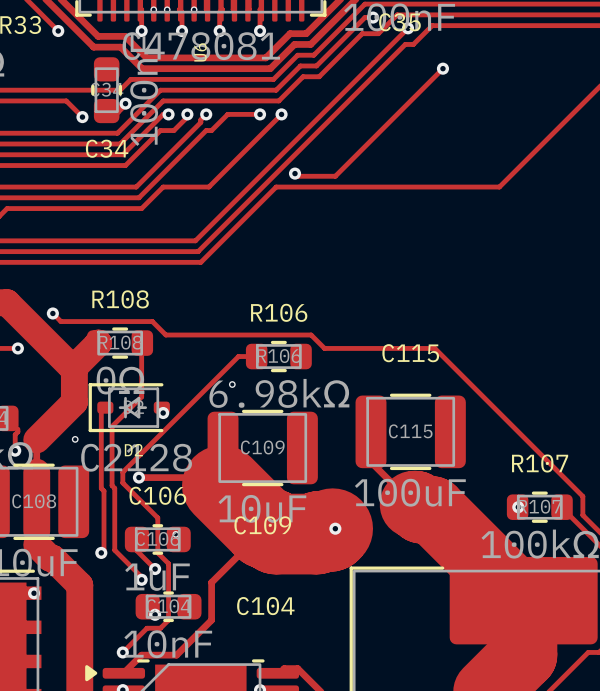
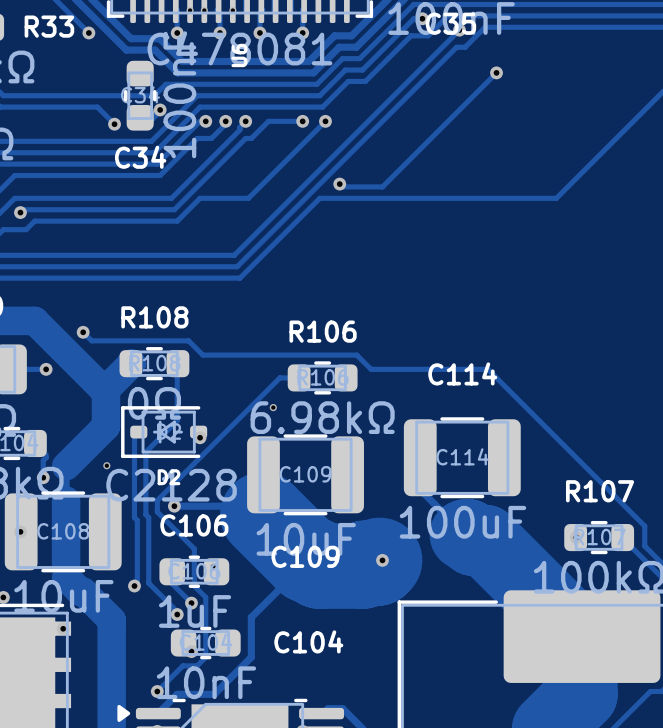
C115 name: C115 (410, 353) -> C114 (462, 373)
text: C115 (410, 431) -> C114 (462, 456)

